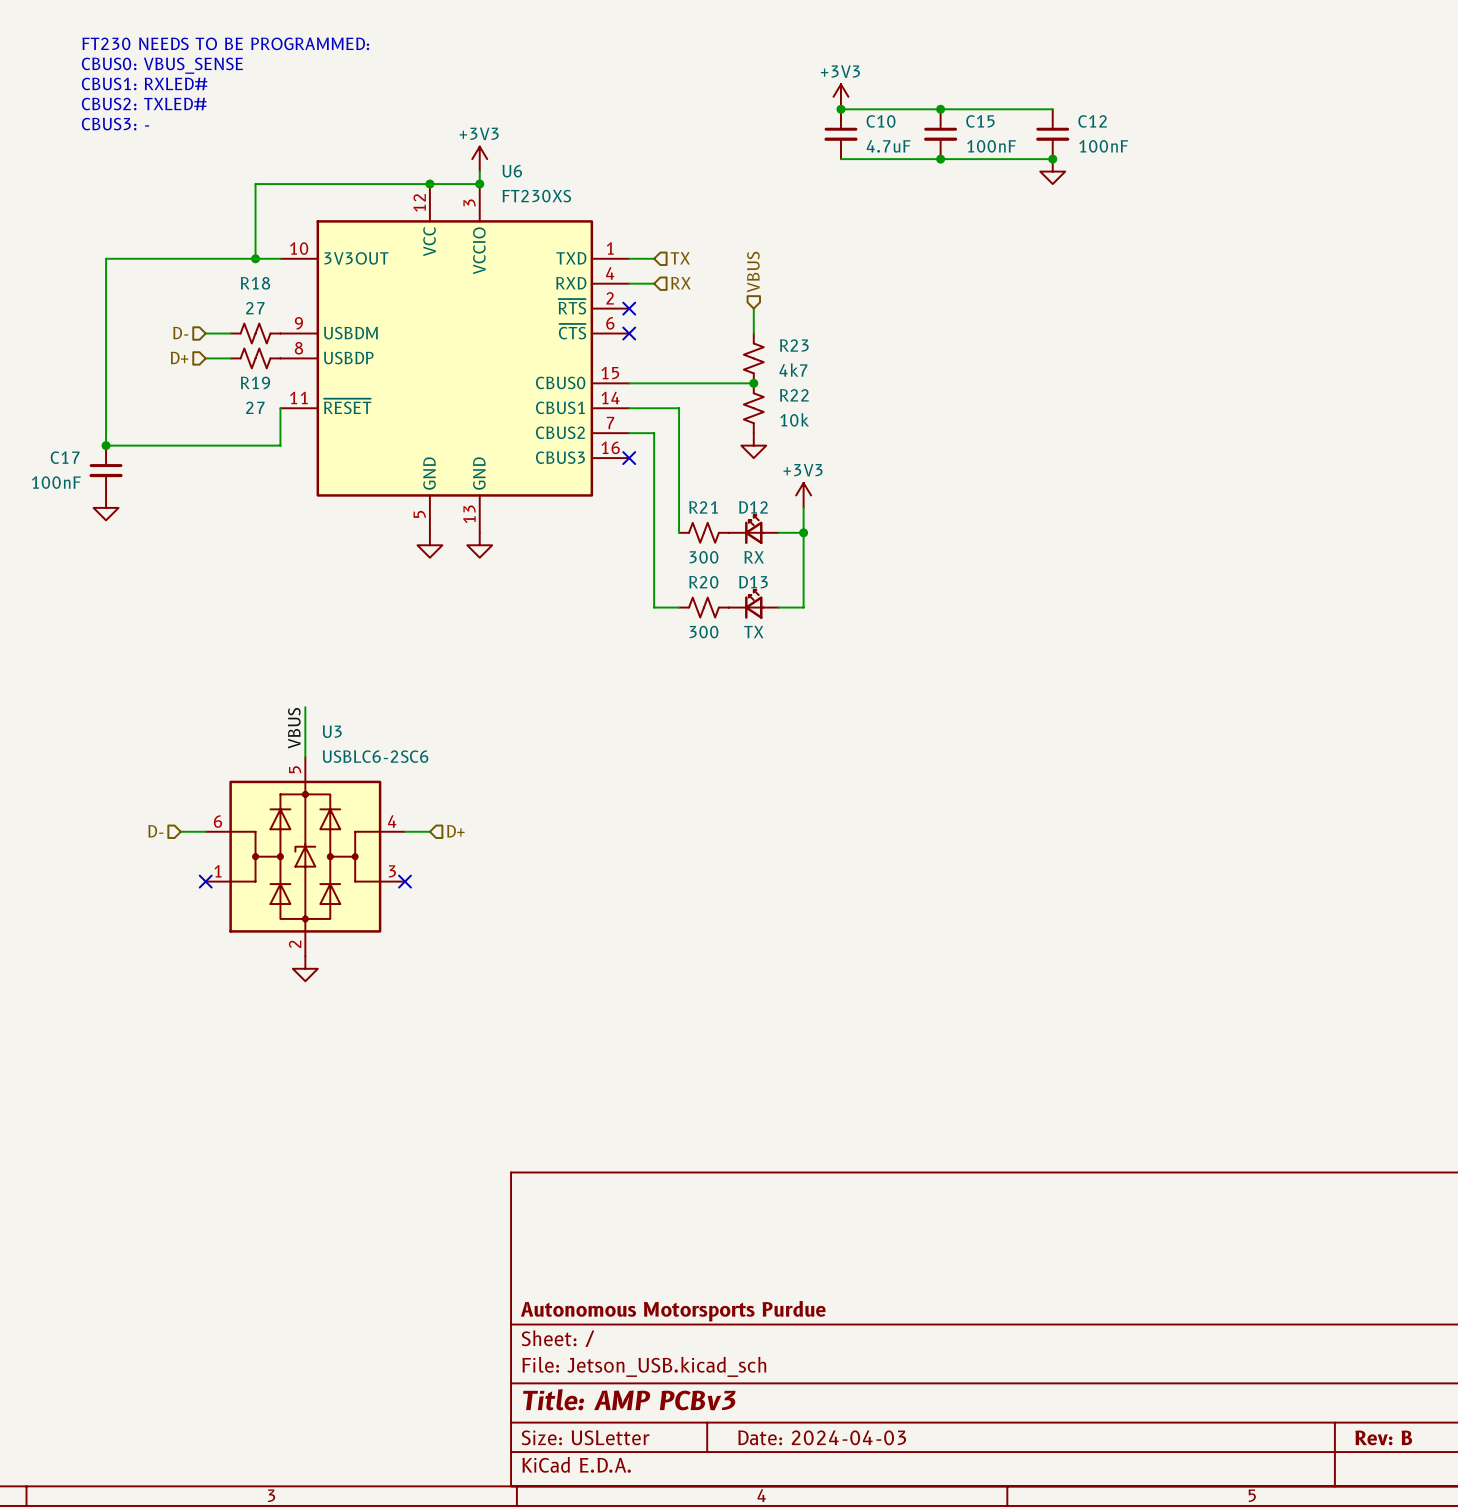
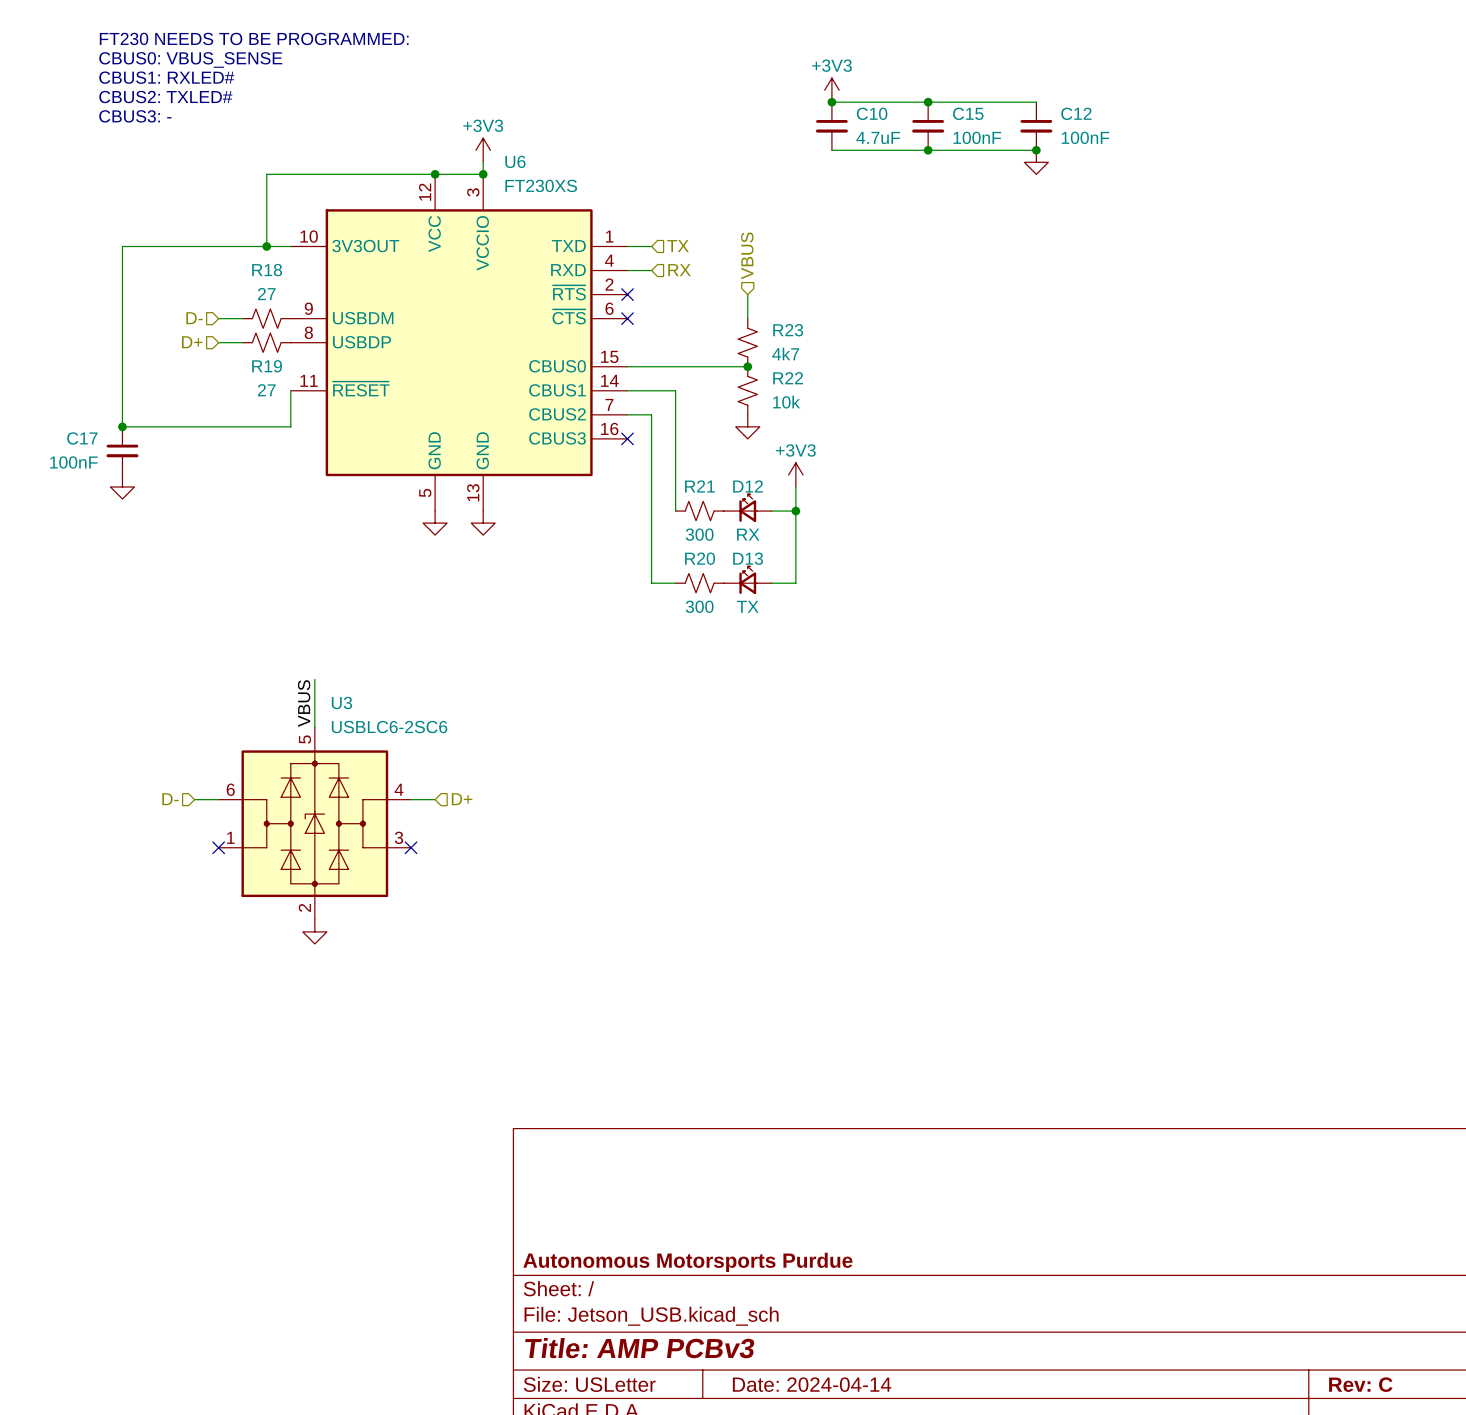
title block: Date: 2024-04-03 (822, 1437) -> Date: 2024-04-14 (812, 1384)
title block: Rev: B (1383, 1437) -> Rev: C (1360, 1384)

